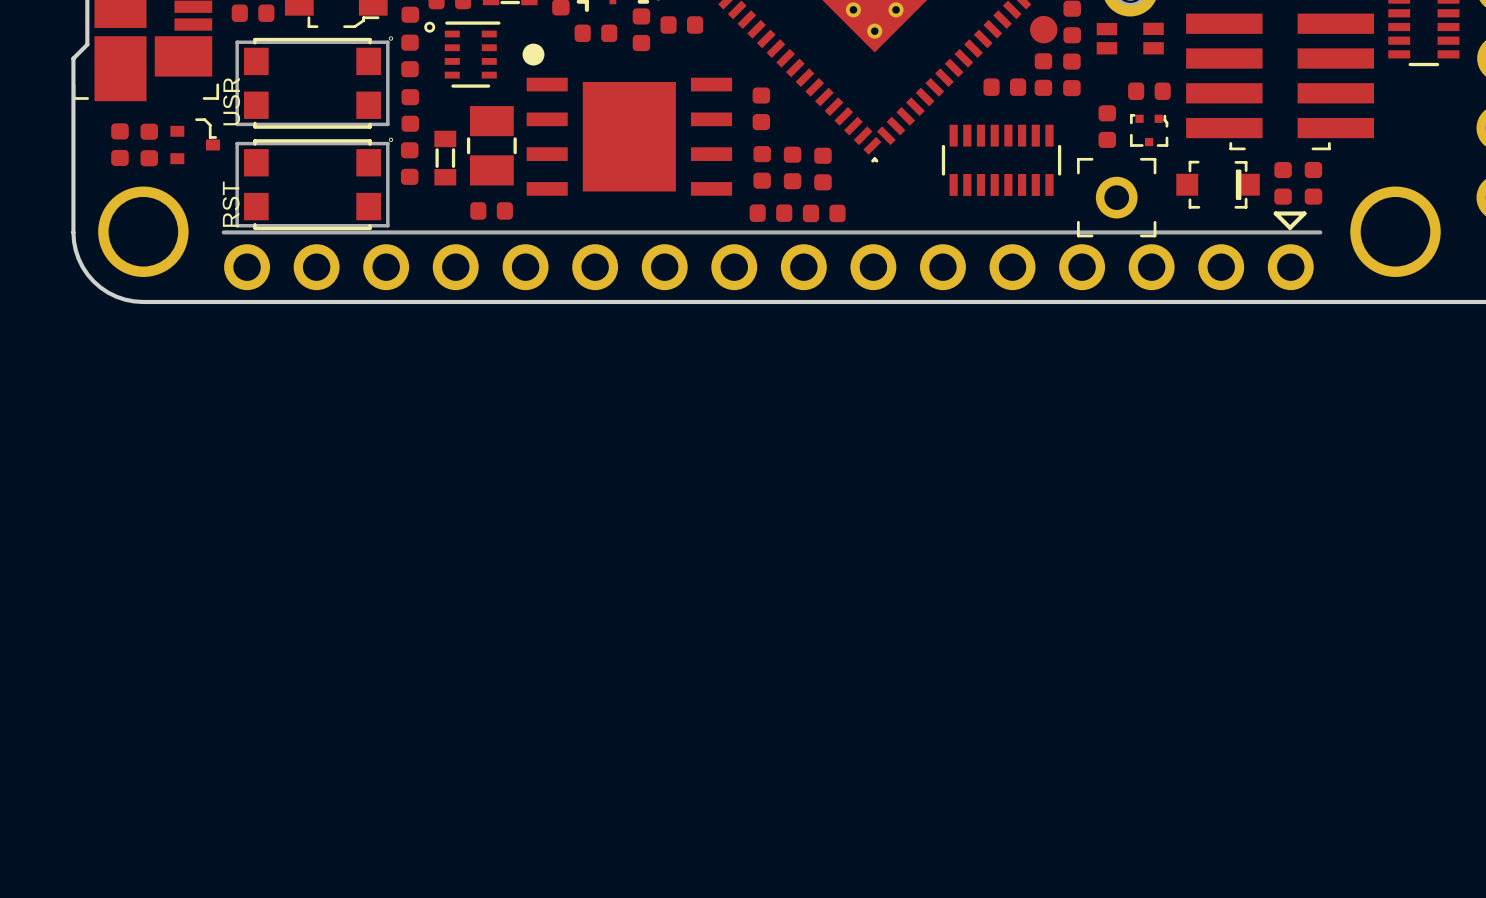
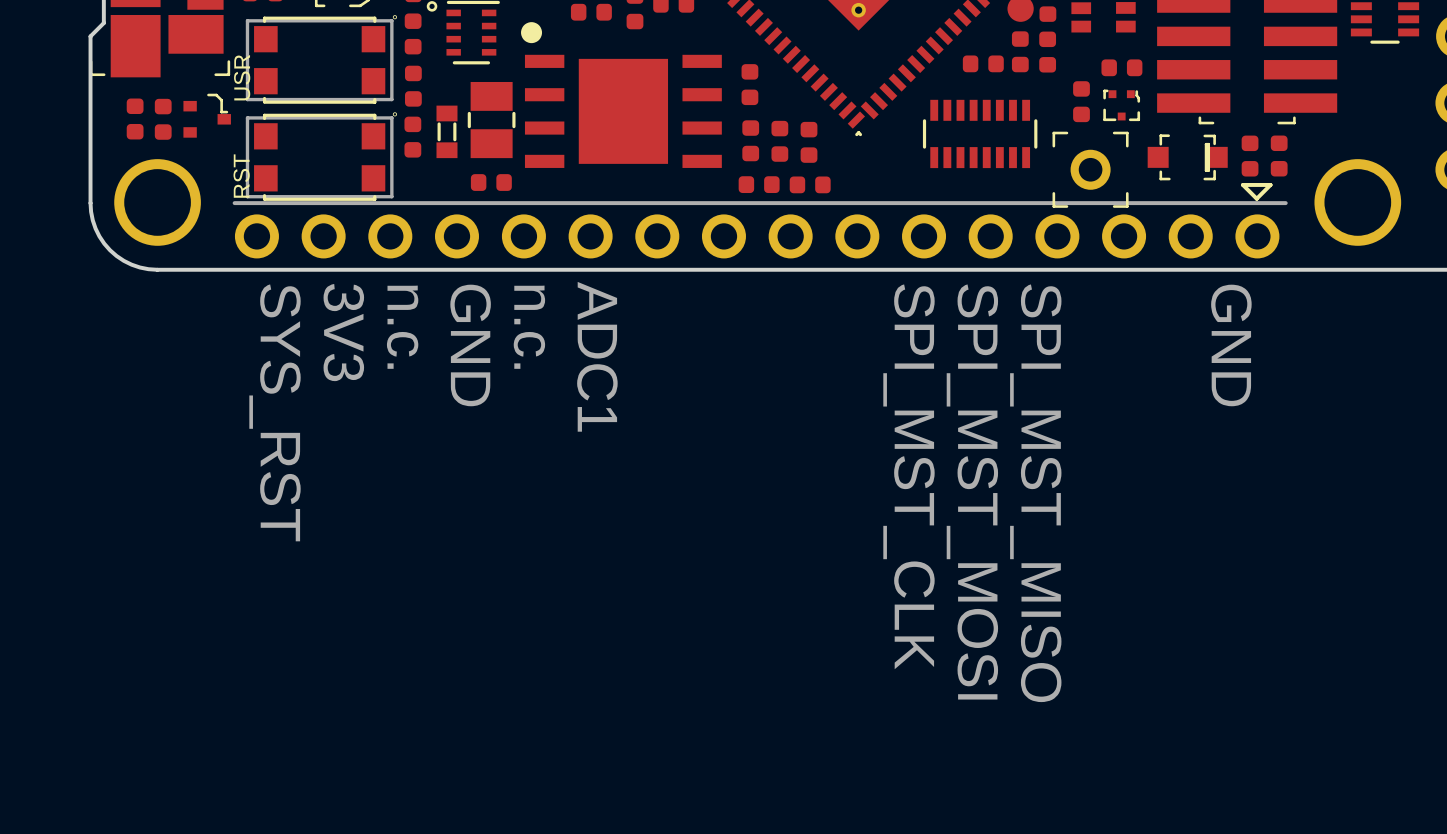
text: none -> n.c. (402, 327)
text: none -> n.c. (529, 327)
text: none -> 3V3 (343, 332)
text: none -> GND (470, 345)
text: none -> GND (1231, 345)
text: none -> ADC1 (597, 356)
text: none -> SYS_RST (275, 412)
text: none -> SPI_MST_CLK (908, 476)
text: none -> SPI_MST_MOSI (972, 491)
text: none -> SPI_MST_MISO (1035, 493)

